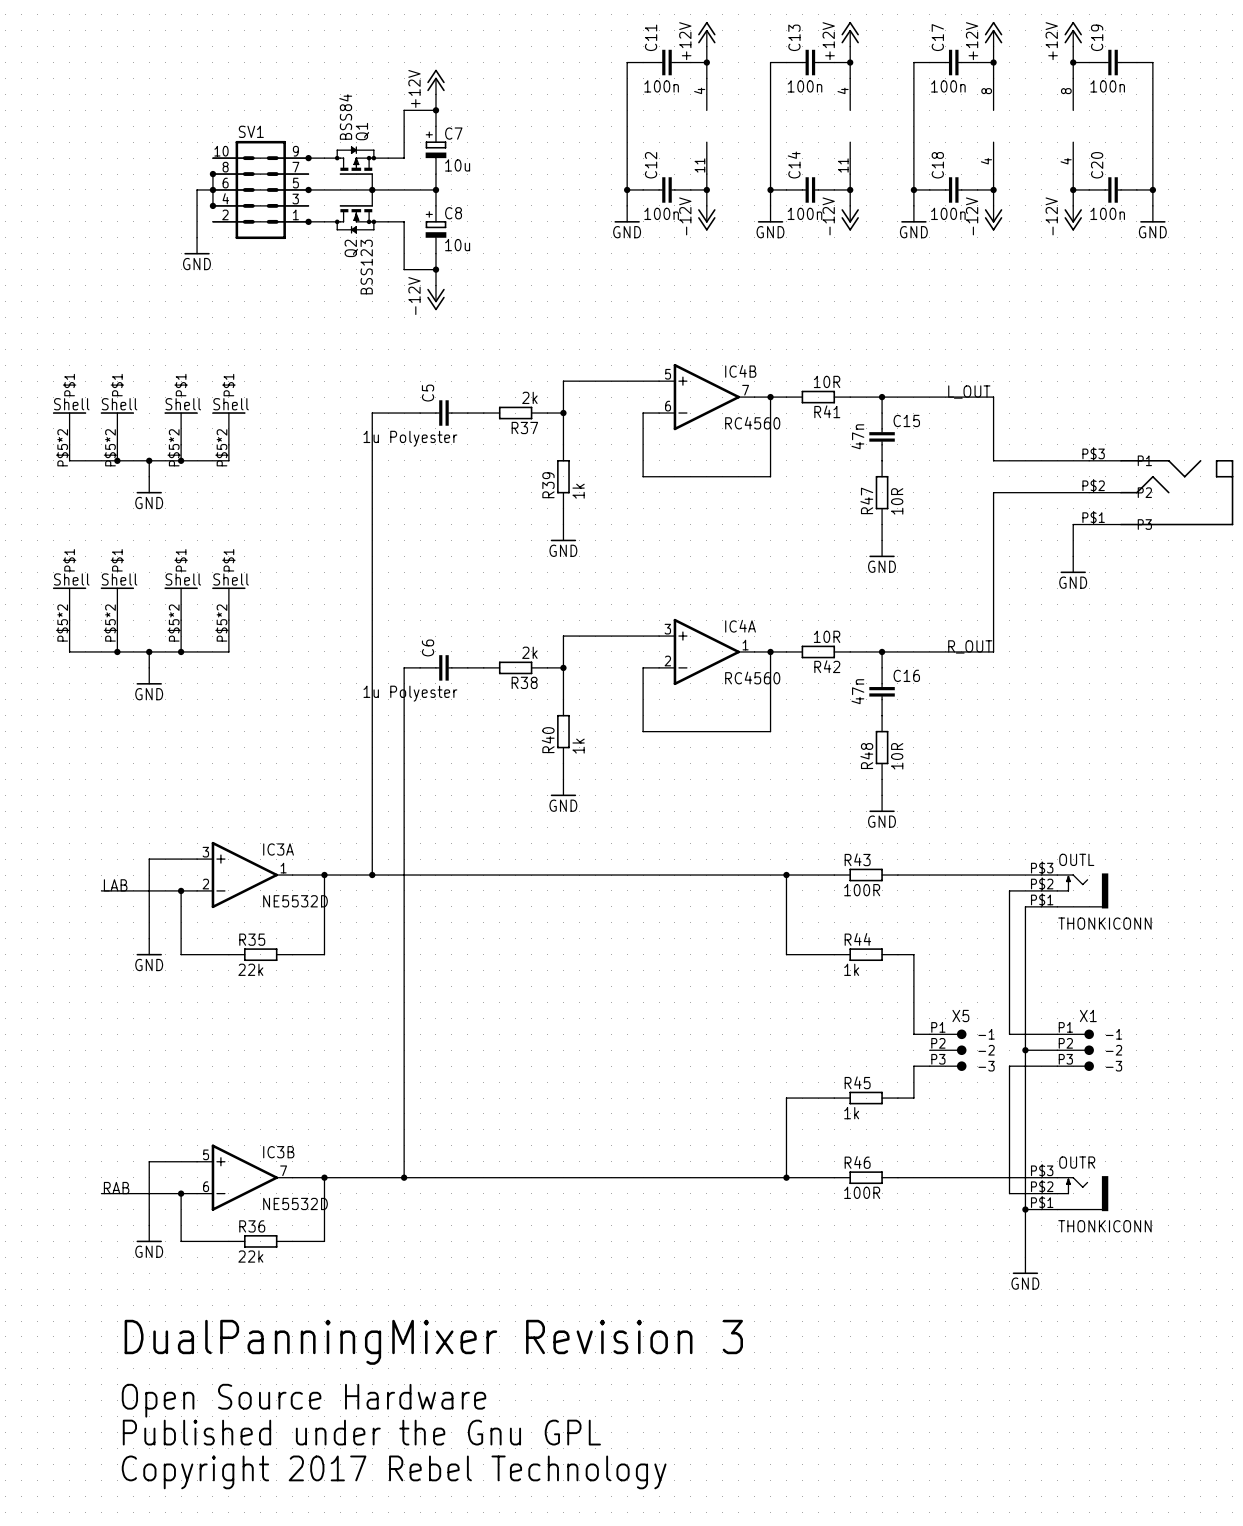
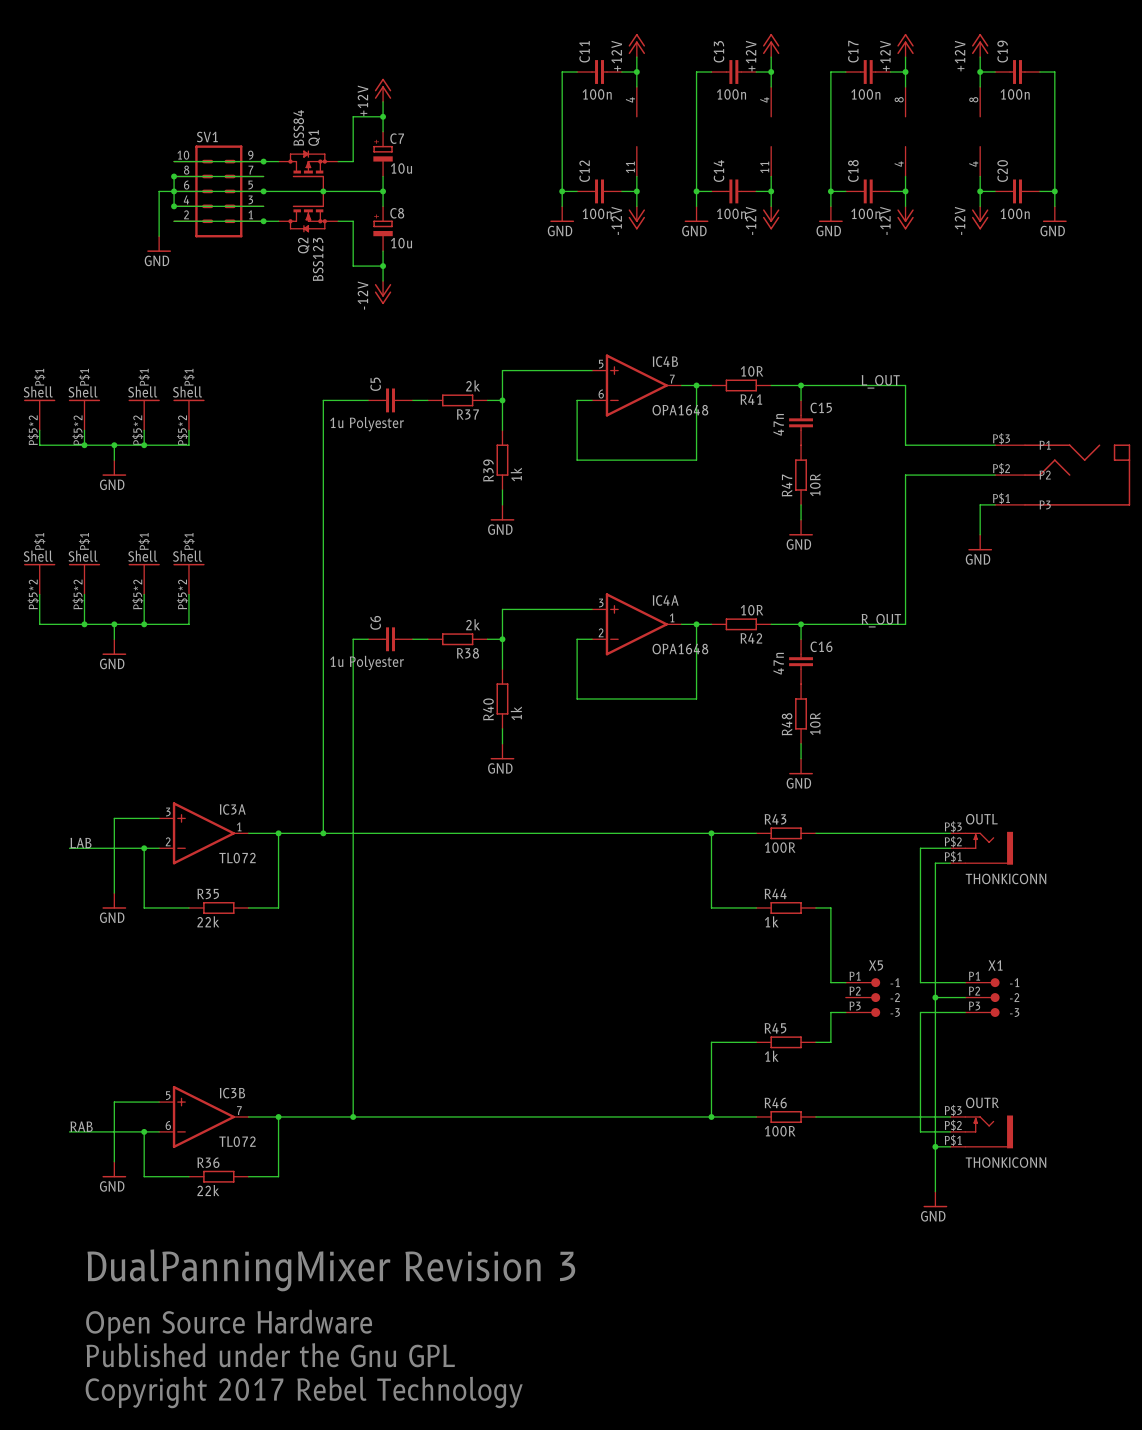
IC4B value: RC4560 (752, 423) -> OPA1648 (680, 410)
IC4A value: RC4560 (752, 677) -> OPA1648 (680, 649)
IC3A value: NE5532D (295, 901) -> TL072 (237, 858)
IC3B value: NE5532D (295, 1203) -> TL072 (237, 1141)

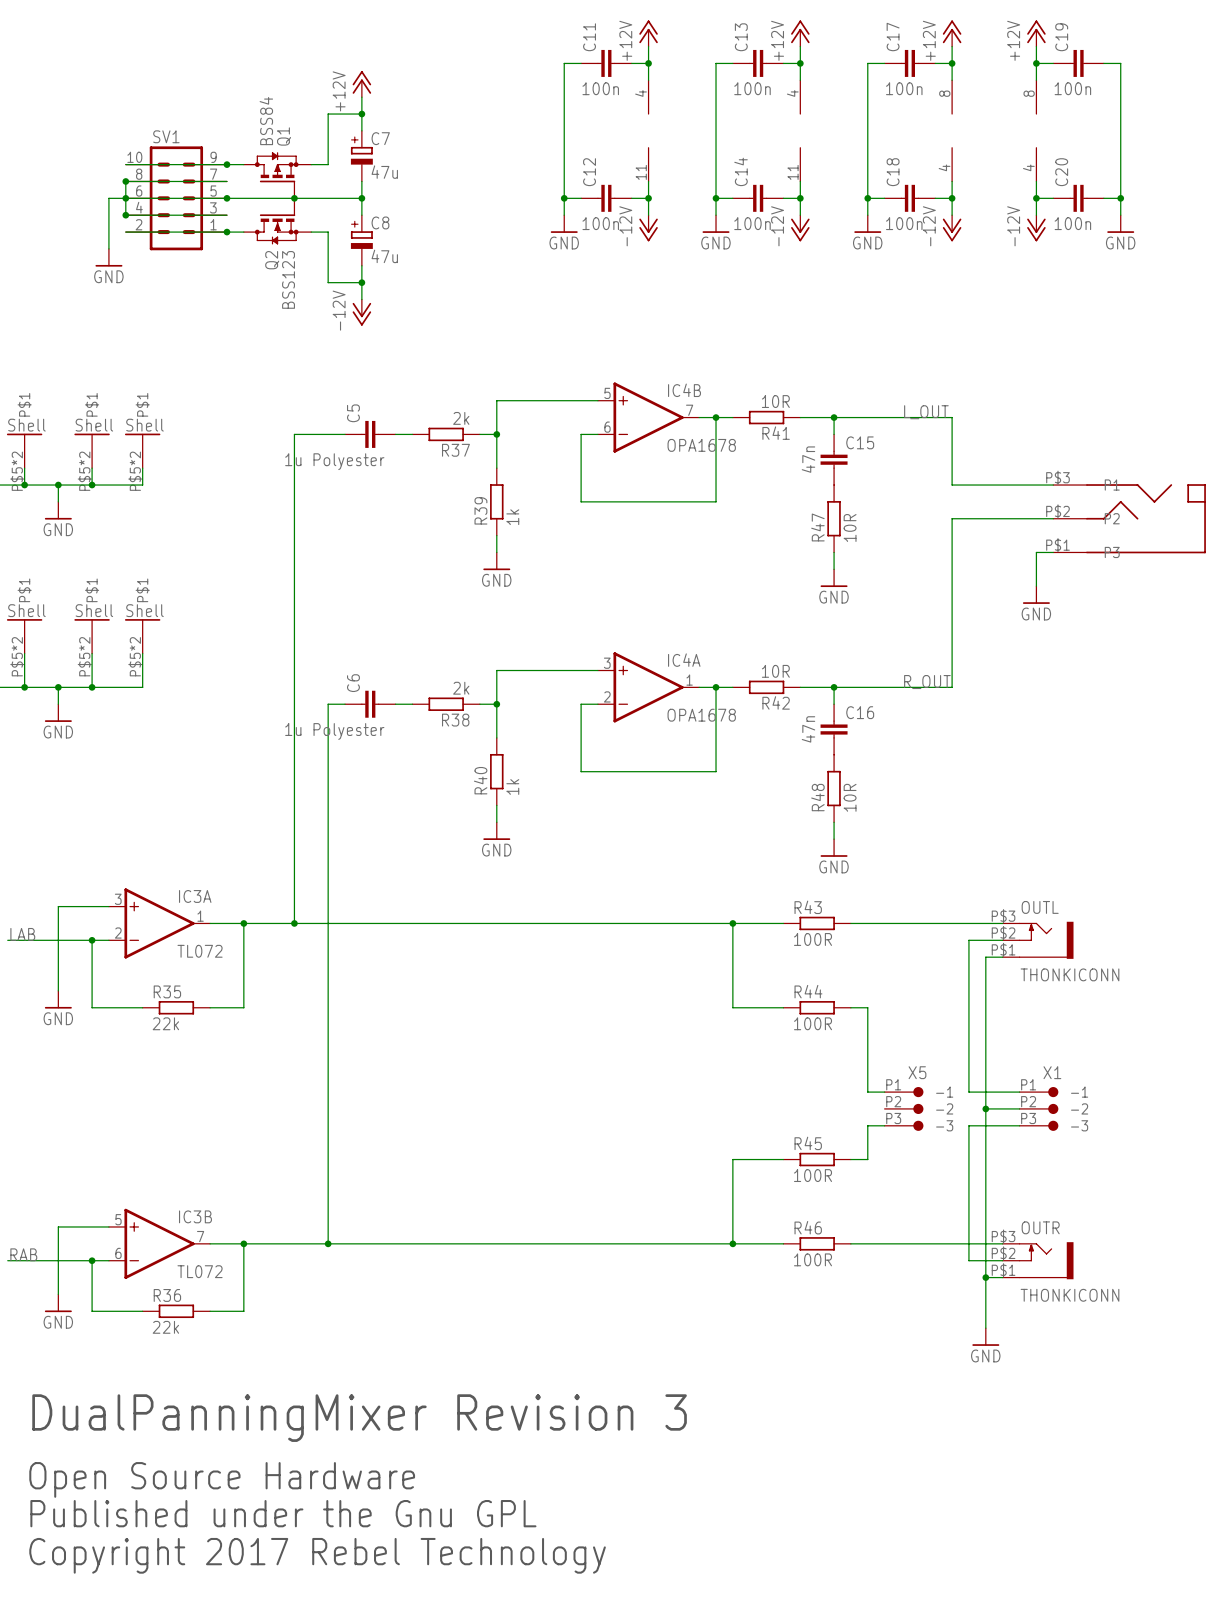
C7 value: 10u (401, 168) -> 47u (384, 172)
C8 value: 10u (401, 243) -> 47u (384, 256)
IC4B value: OPA1648 (680, 410) -> OPA1678 (701, 445)
IC4A value: OPA1648 (680, 649) -> OPA1678 (701, 715)
R44 value: 1k (771, 921) -> 100R (813, 1023)
R45 value: 1k (771, 1056) -> 100R (813, 1175)

